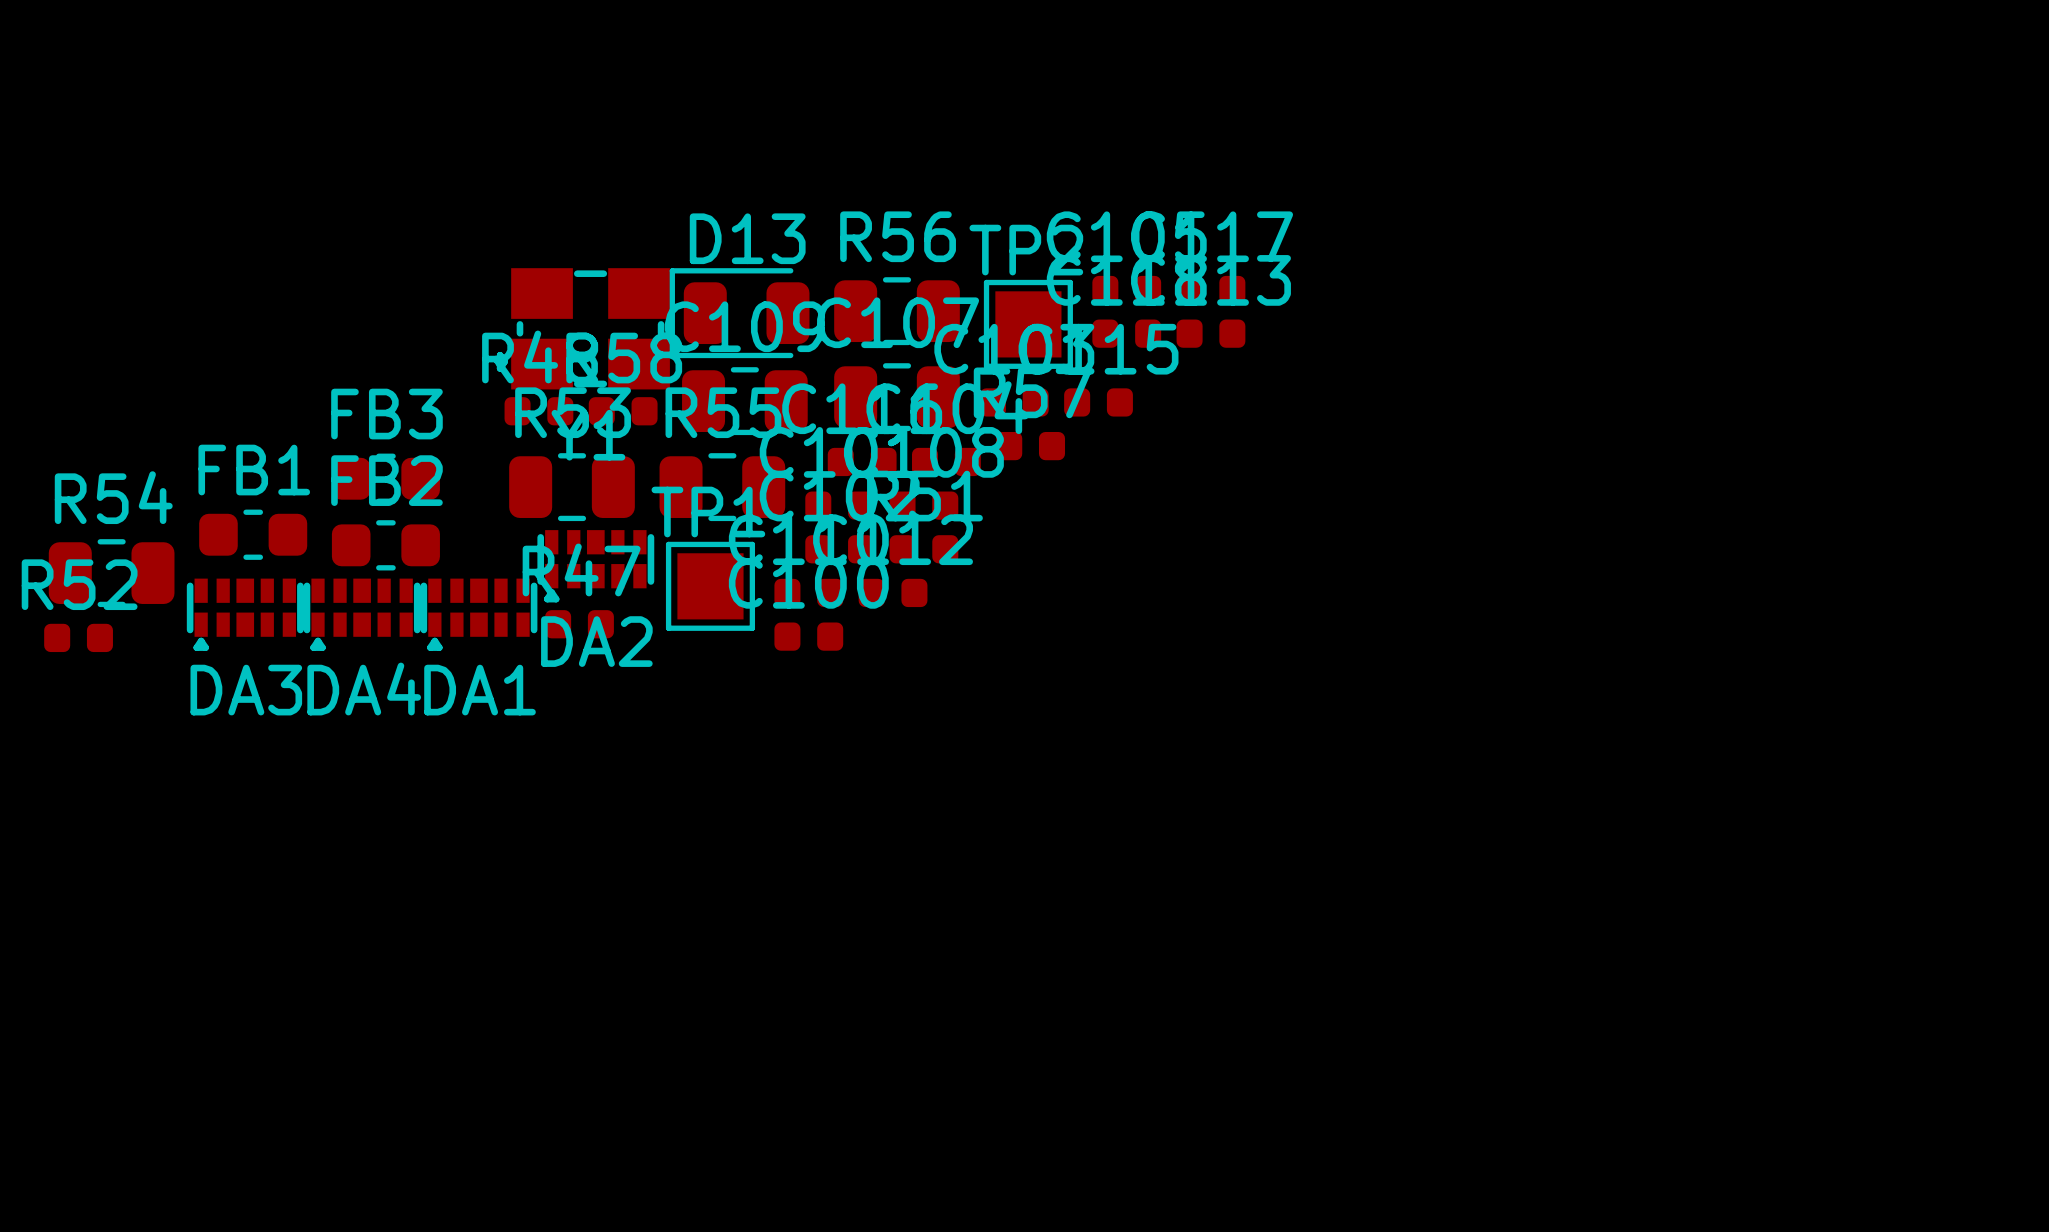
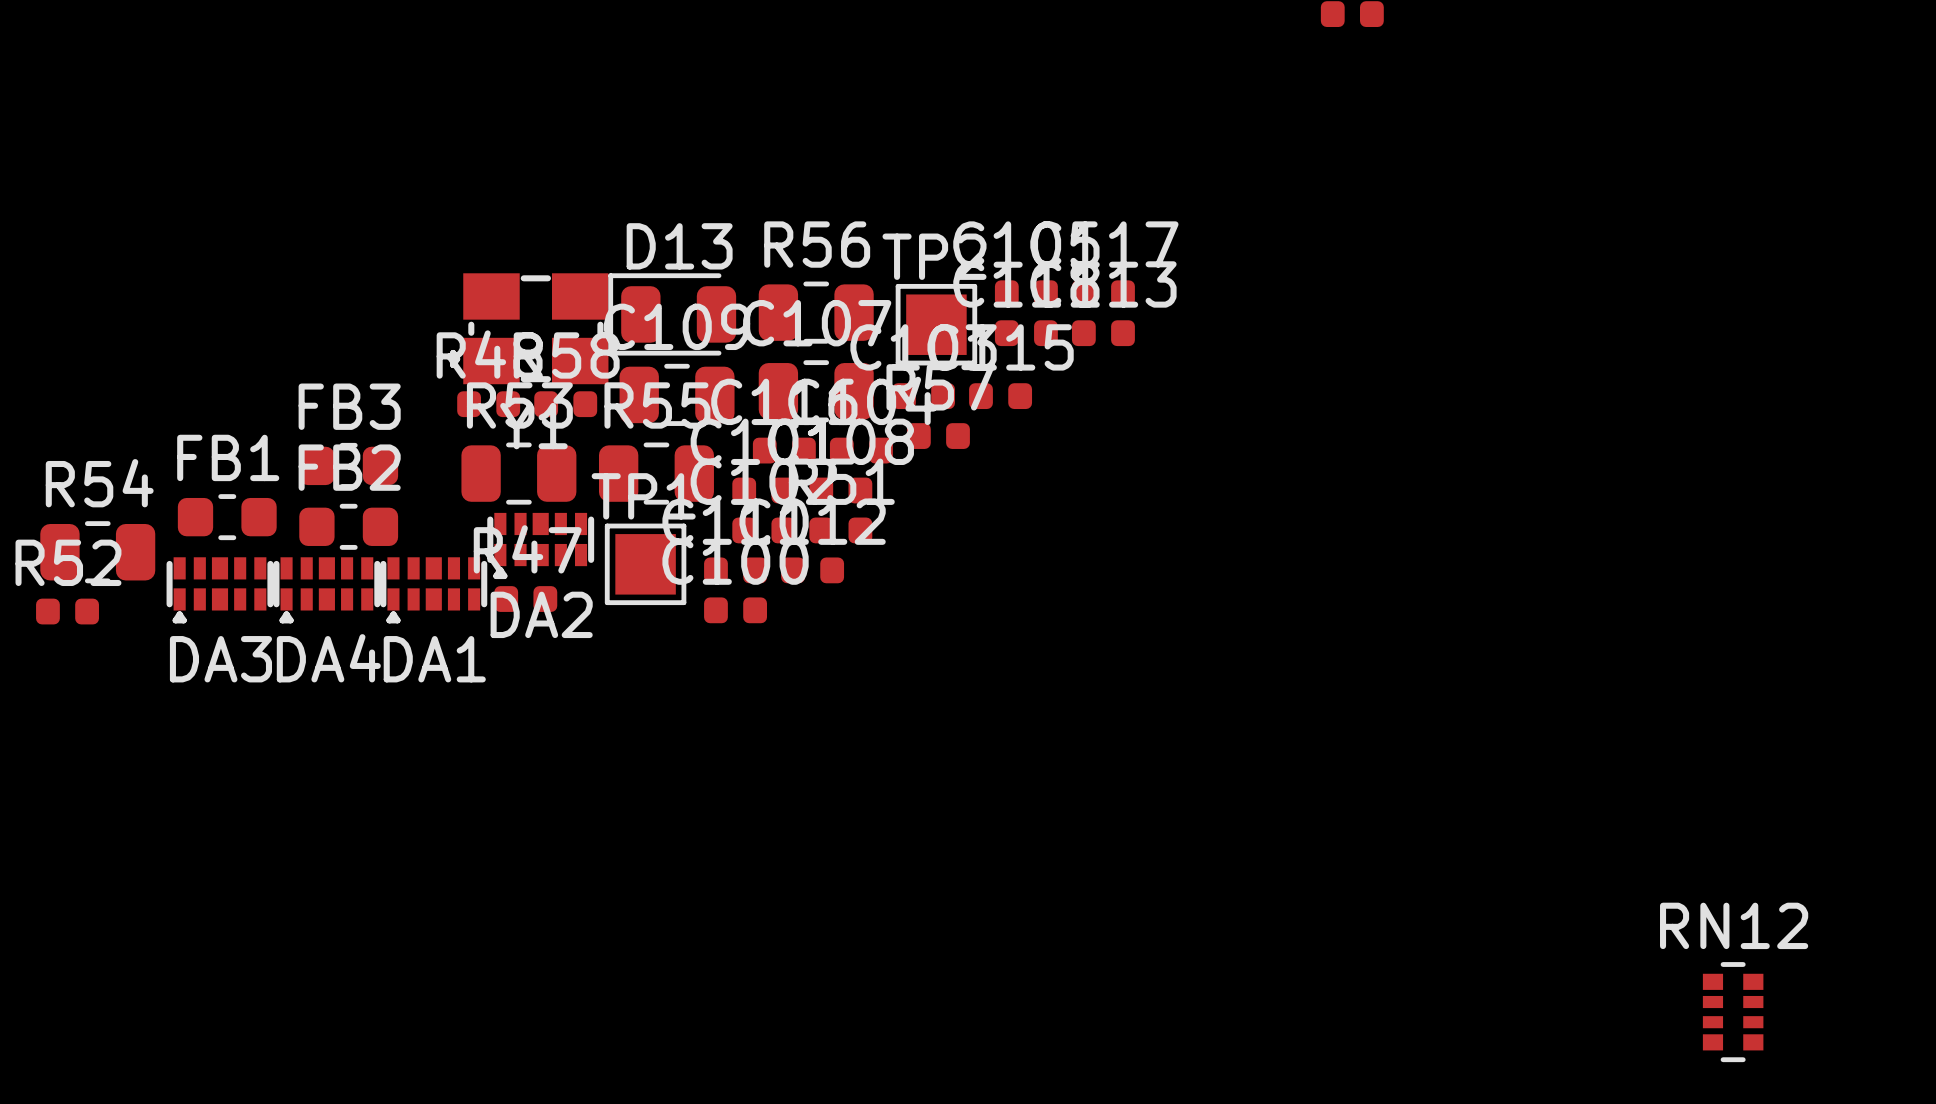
RN12: none -> (1733, 1012)

